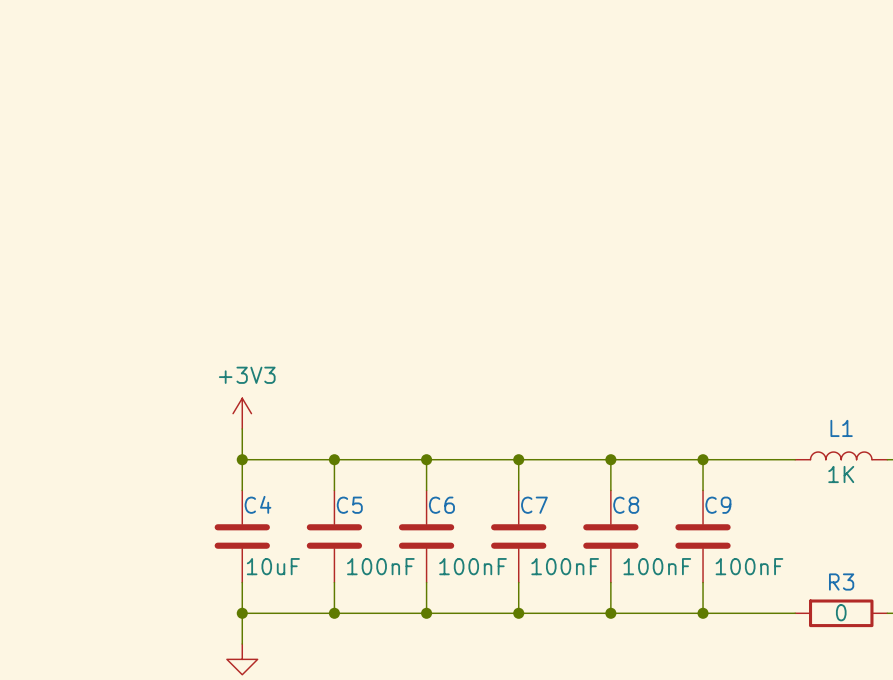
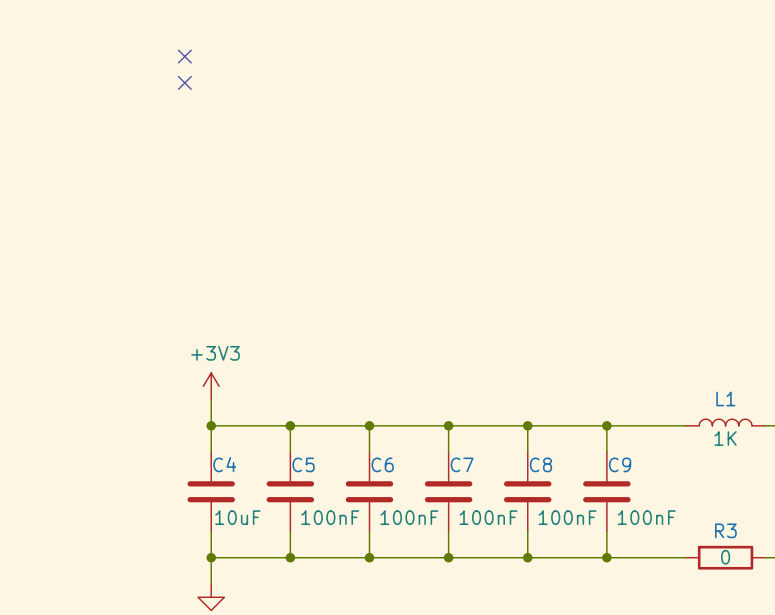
no-connect mark: none -> (184, 56)
no-connect mark: none -> (184, 82)

